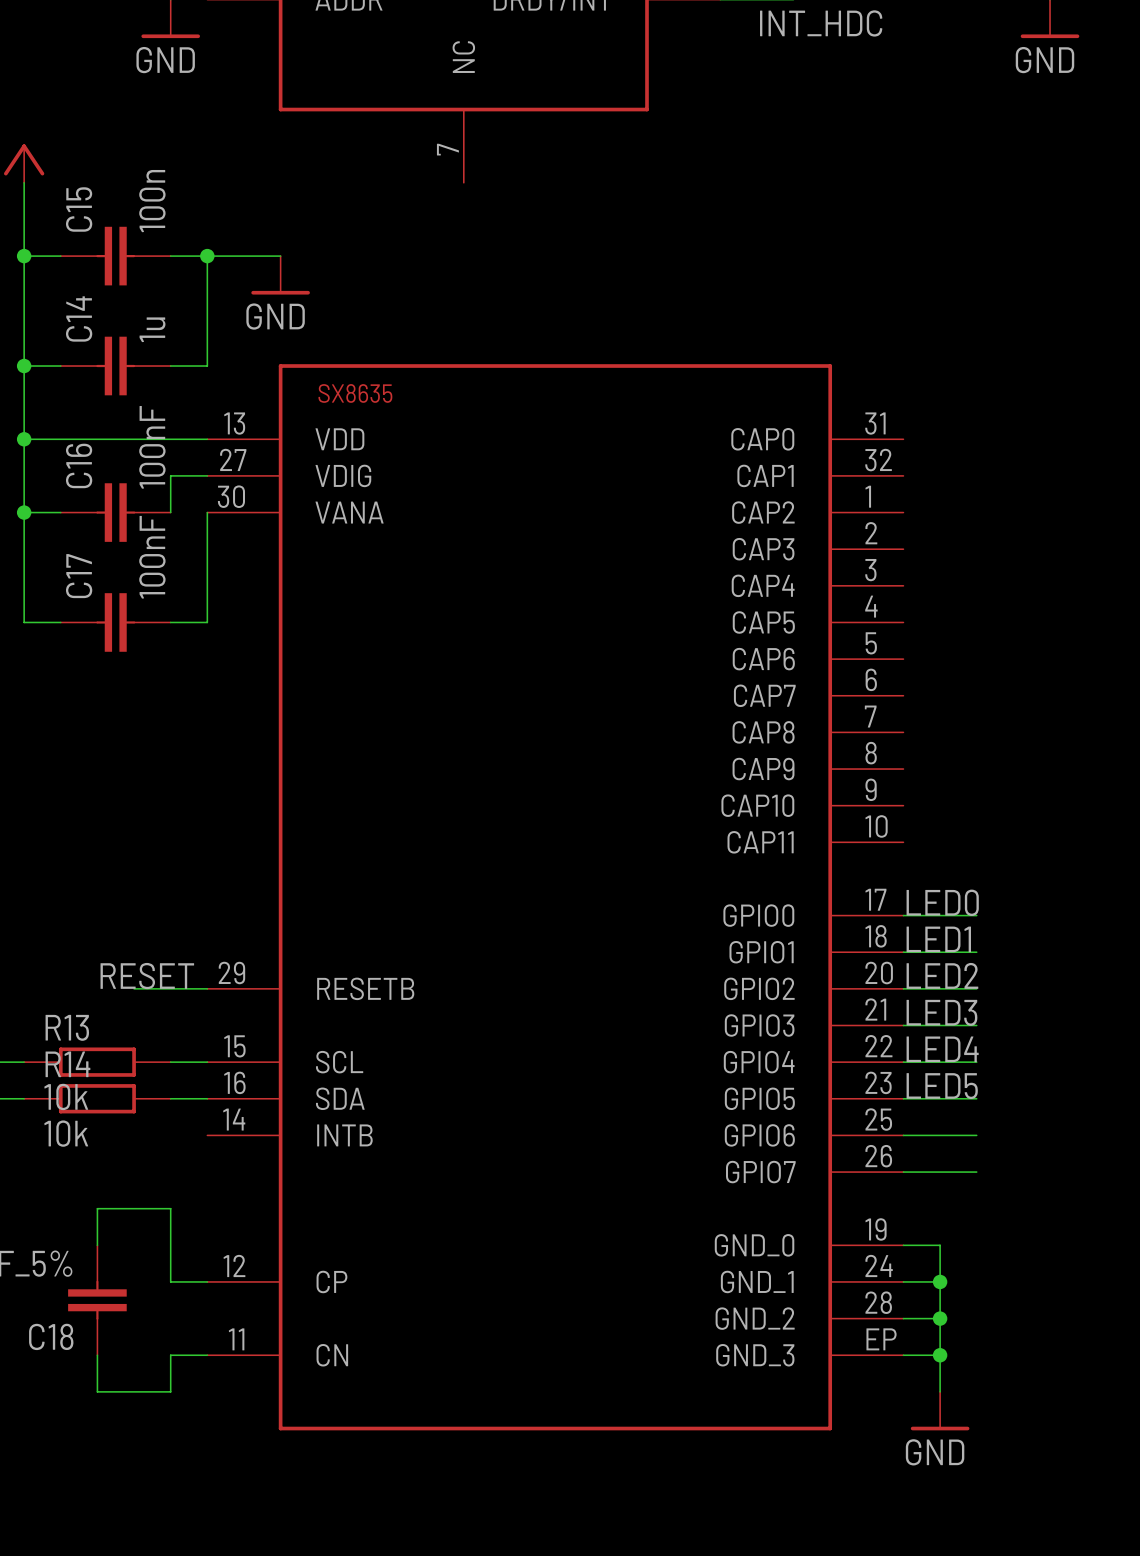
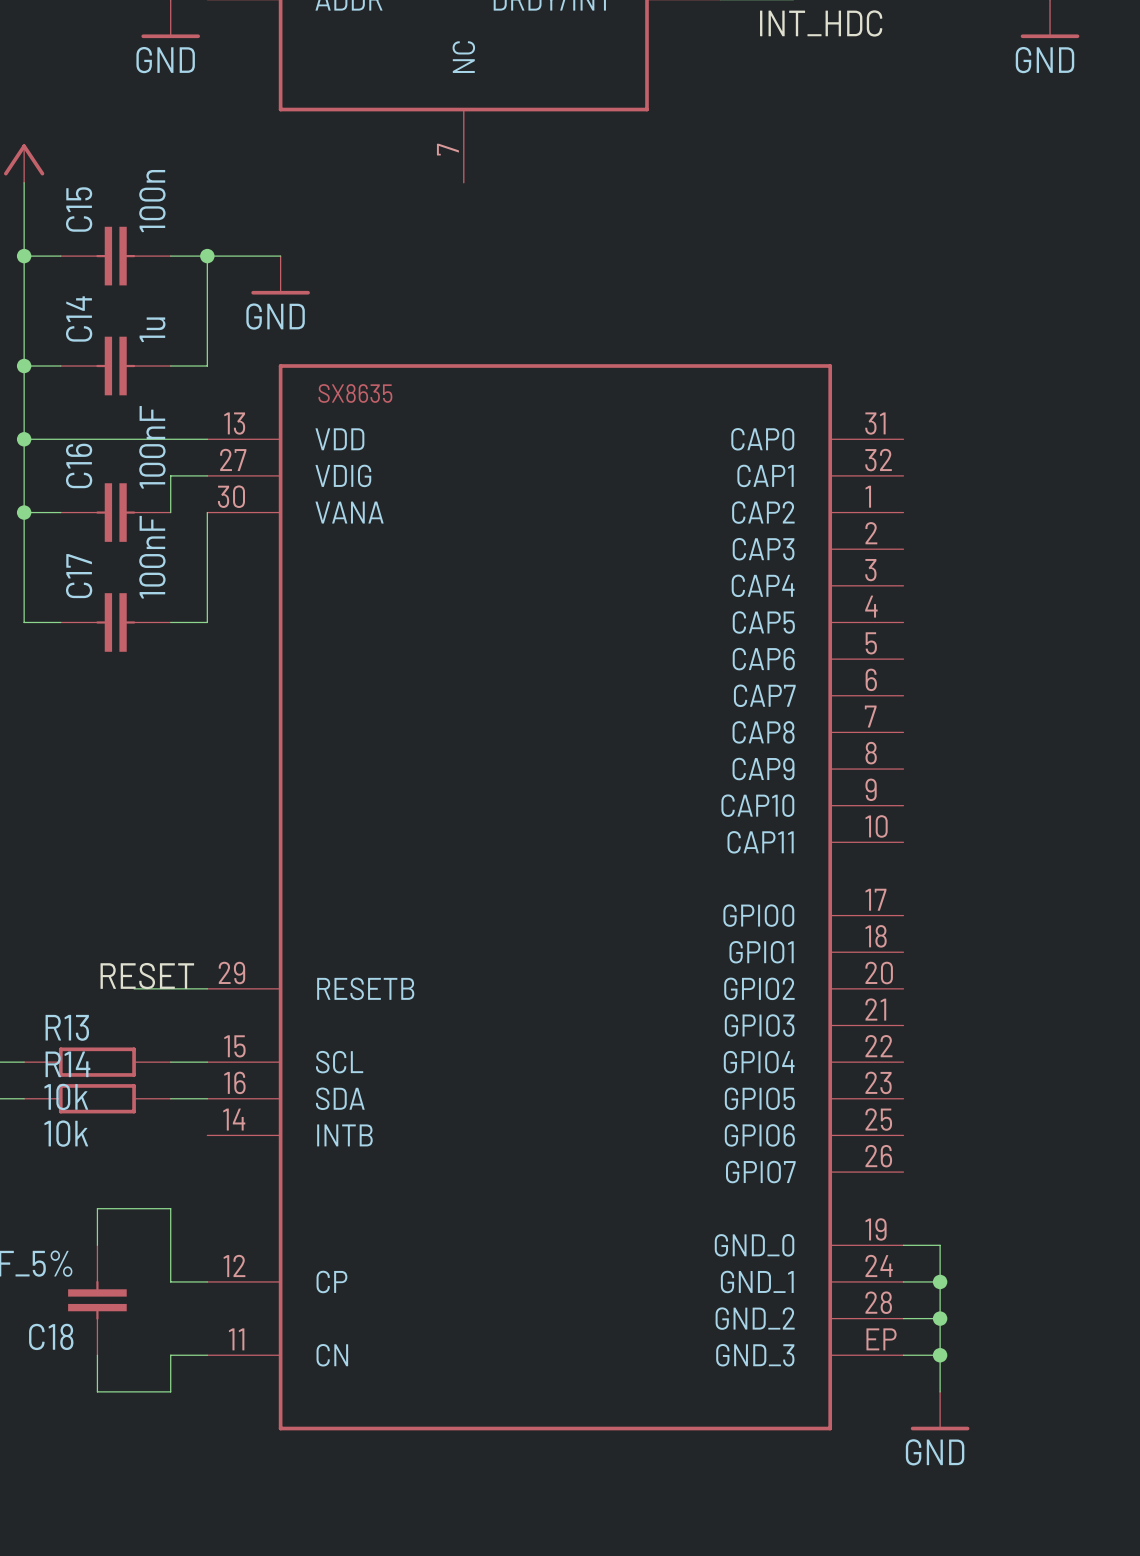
label: LED0 (942, 902) -> none
wire: (903, 915) (976, 915) -> none
label: LED1 (938, 939) -> none
wire: (903, 952) (976, 952) -> none
label: LED2 (942, 975) -> none
wire: (903, 988) (976, 988) -> none
label: LED3 (941, 1012) -> none
wire: (903, 1025) (976, 1025) -> none
label: LED4 (942, 1049) -> none
wire: (903, 1062) (976, 1062) -> none
label: LED5 (942, 1086) -> none
wire: (903, 1098) (976, 1098) -> none
wire: (903, 1135) (976, 1135) -> none
wire: (903, 1172) (976, 1172) -> none

